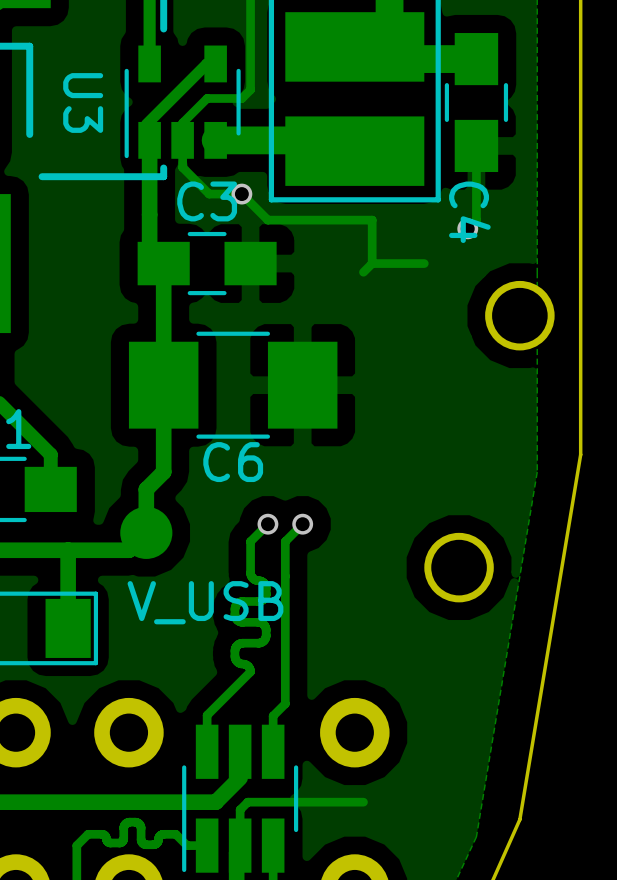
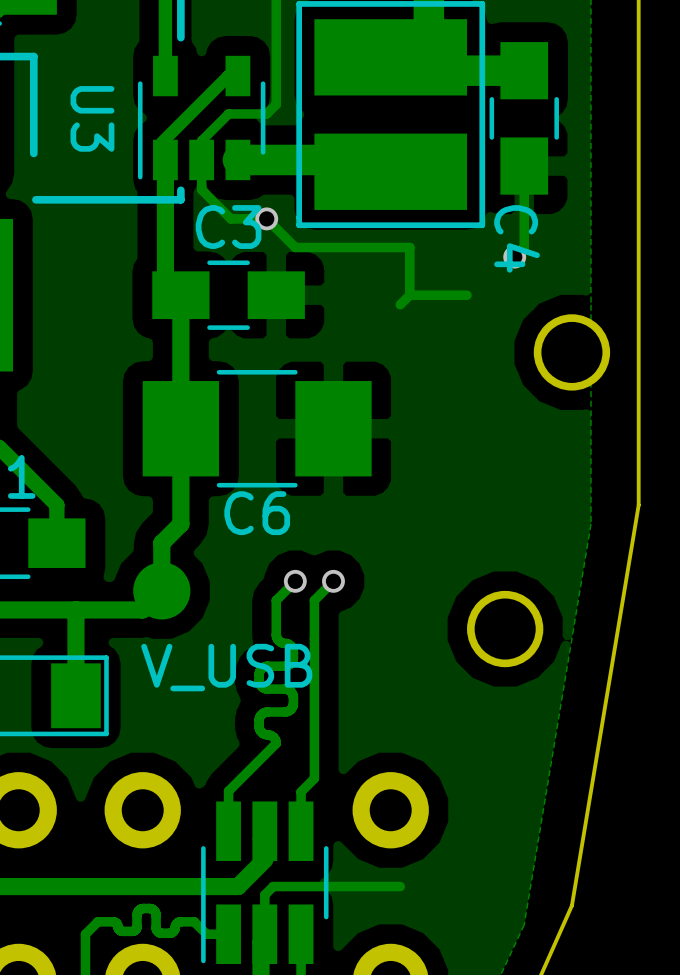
line: none -> (47, 199) (35, 199)

